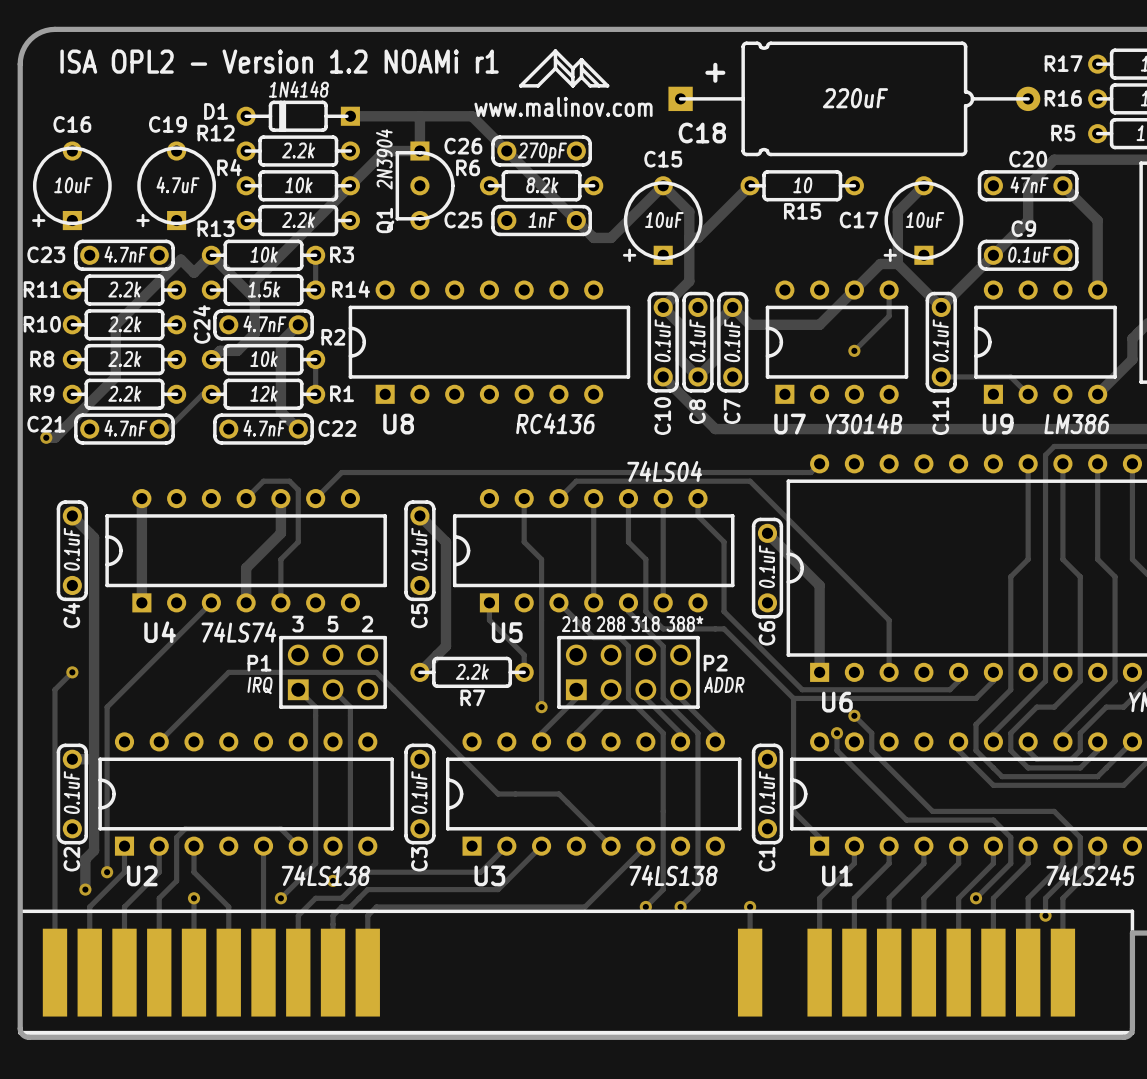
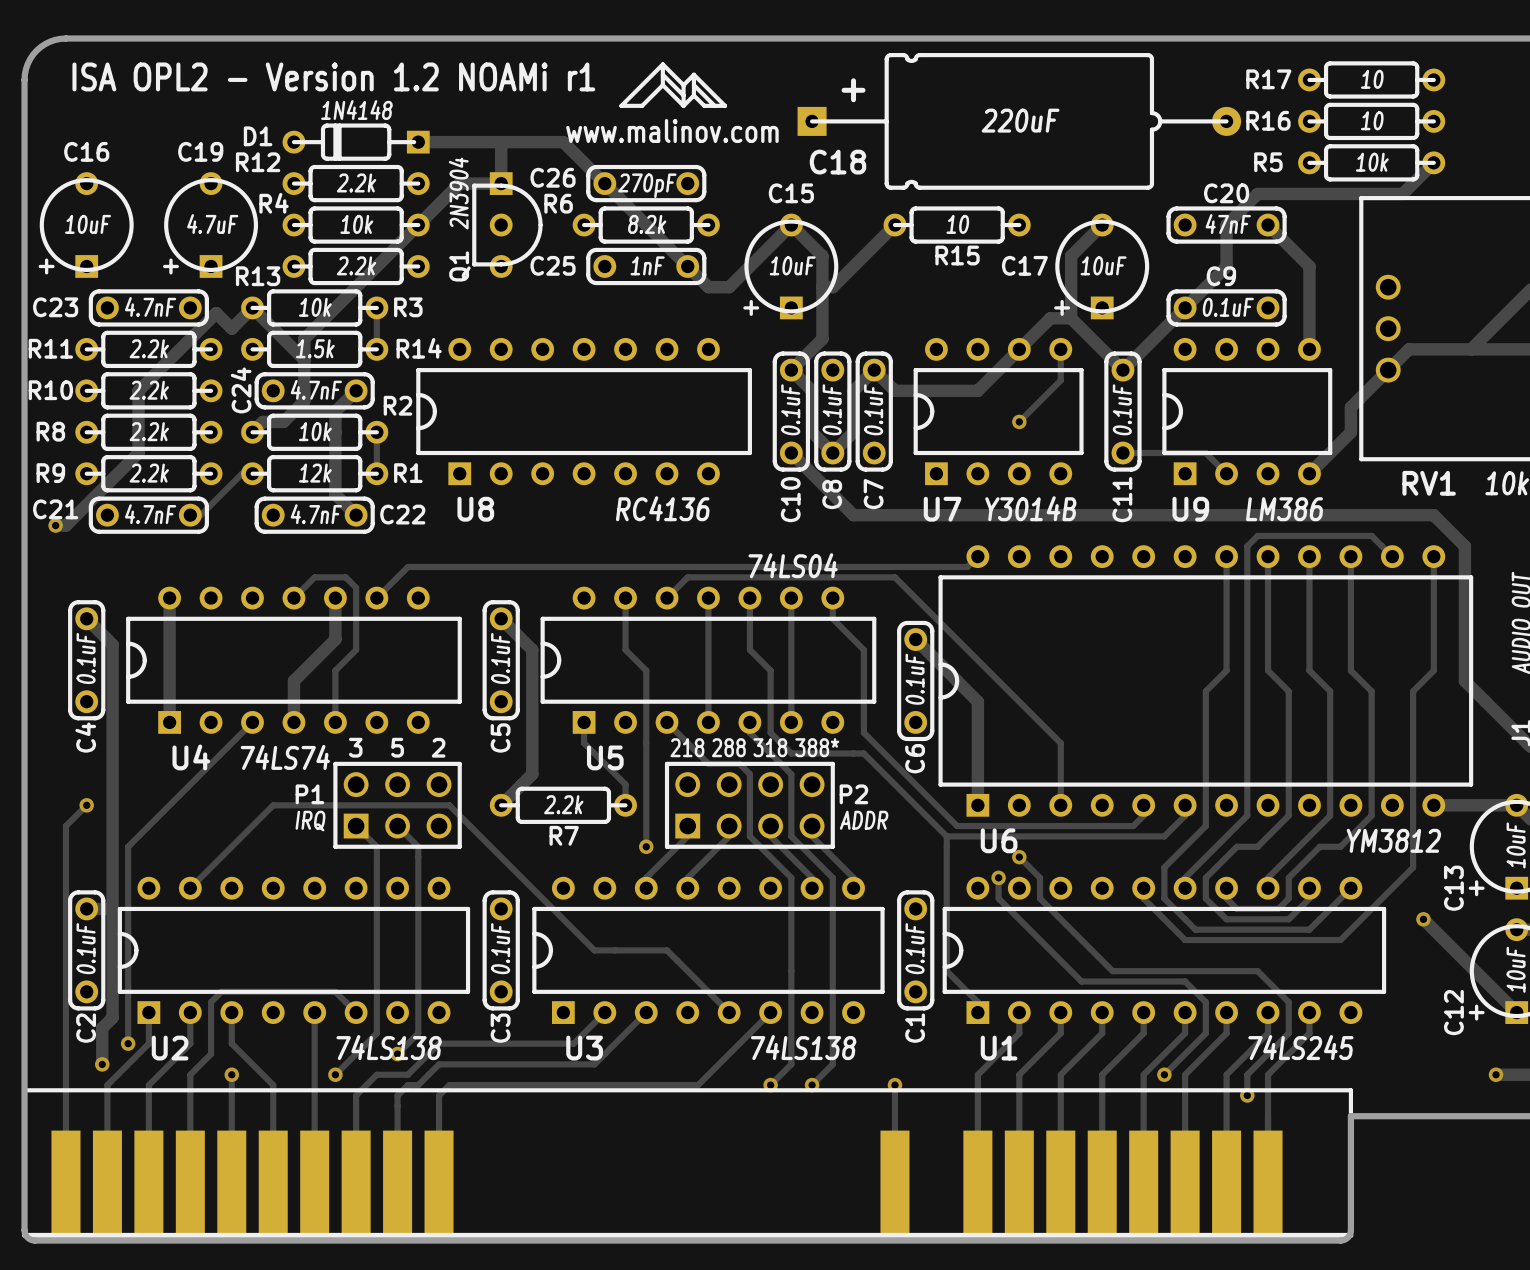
part footprint: [18, 909, 1135, 1036] -> [22, 1088, 1354, 1238]

